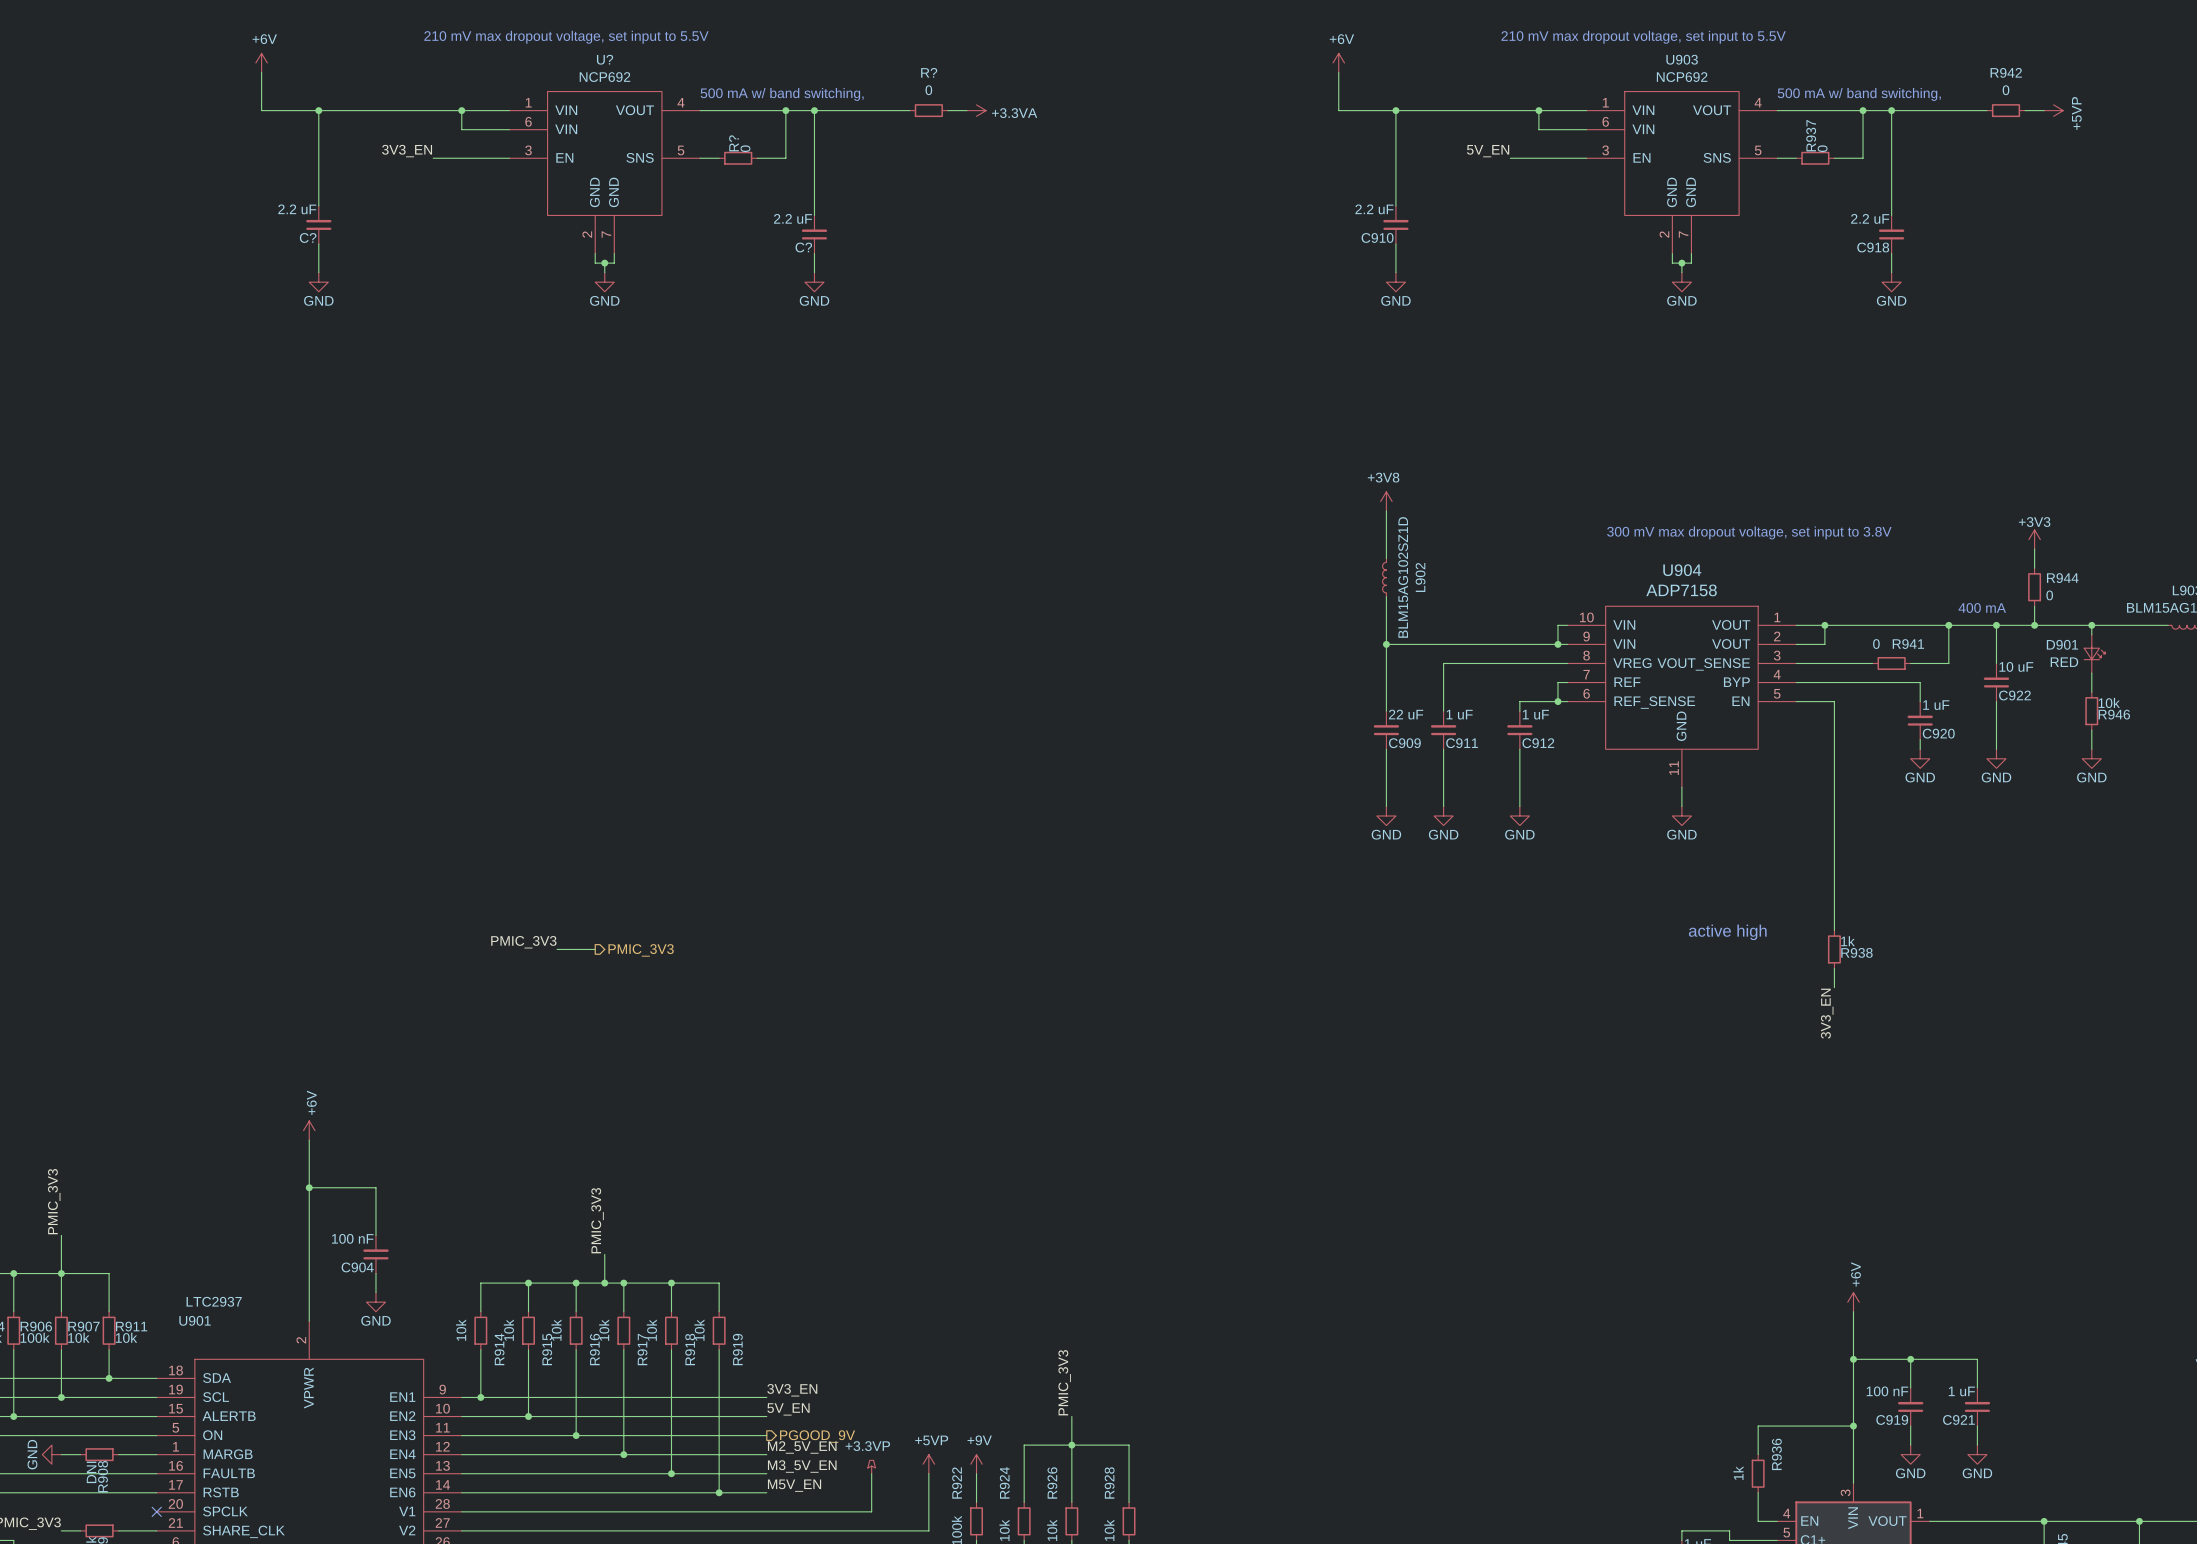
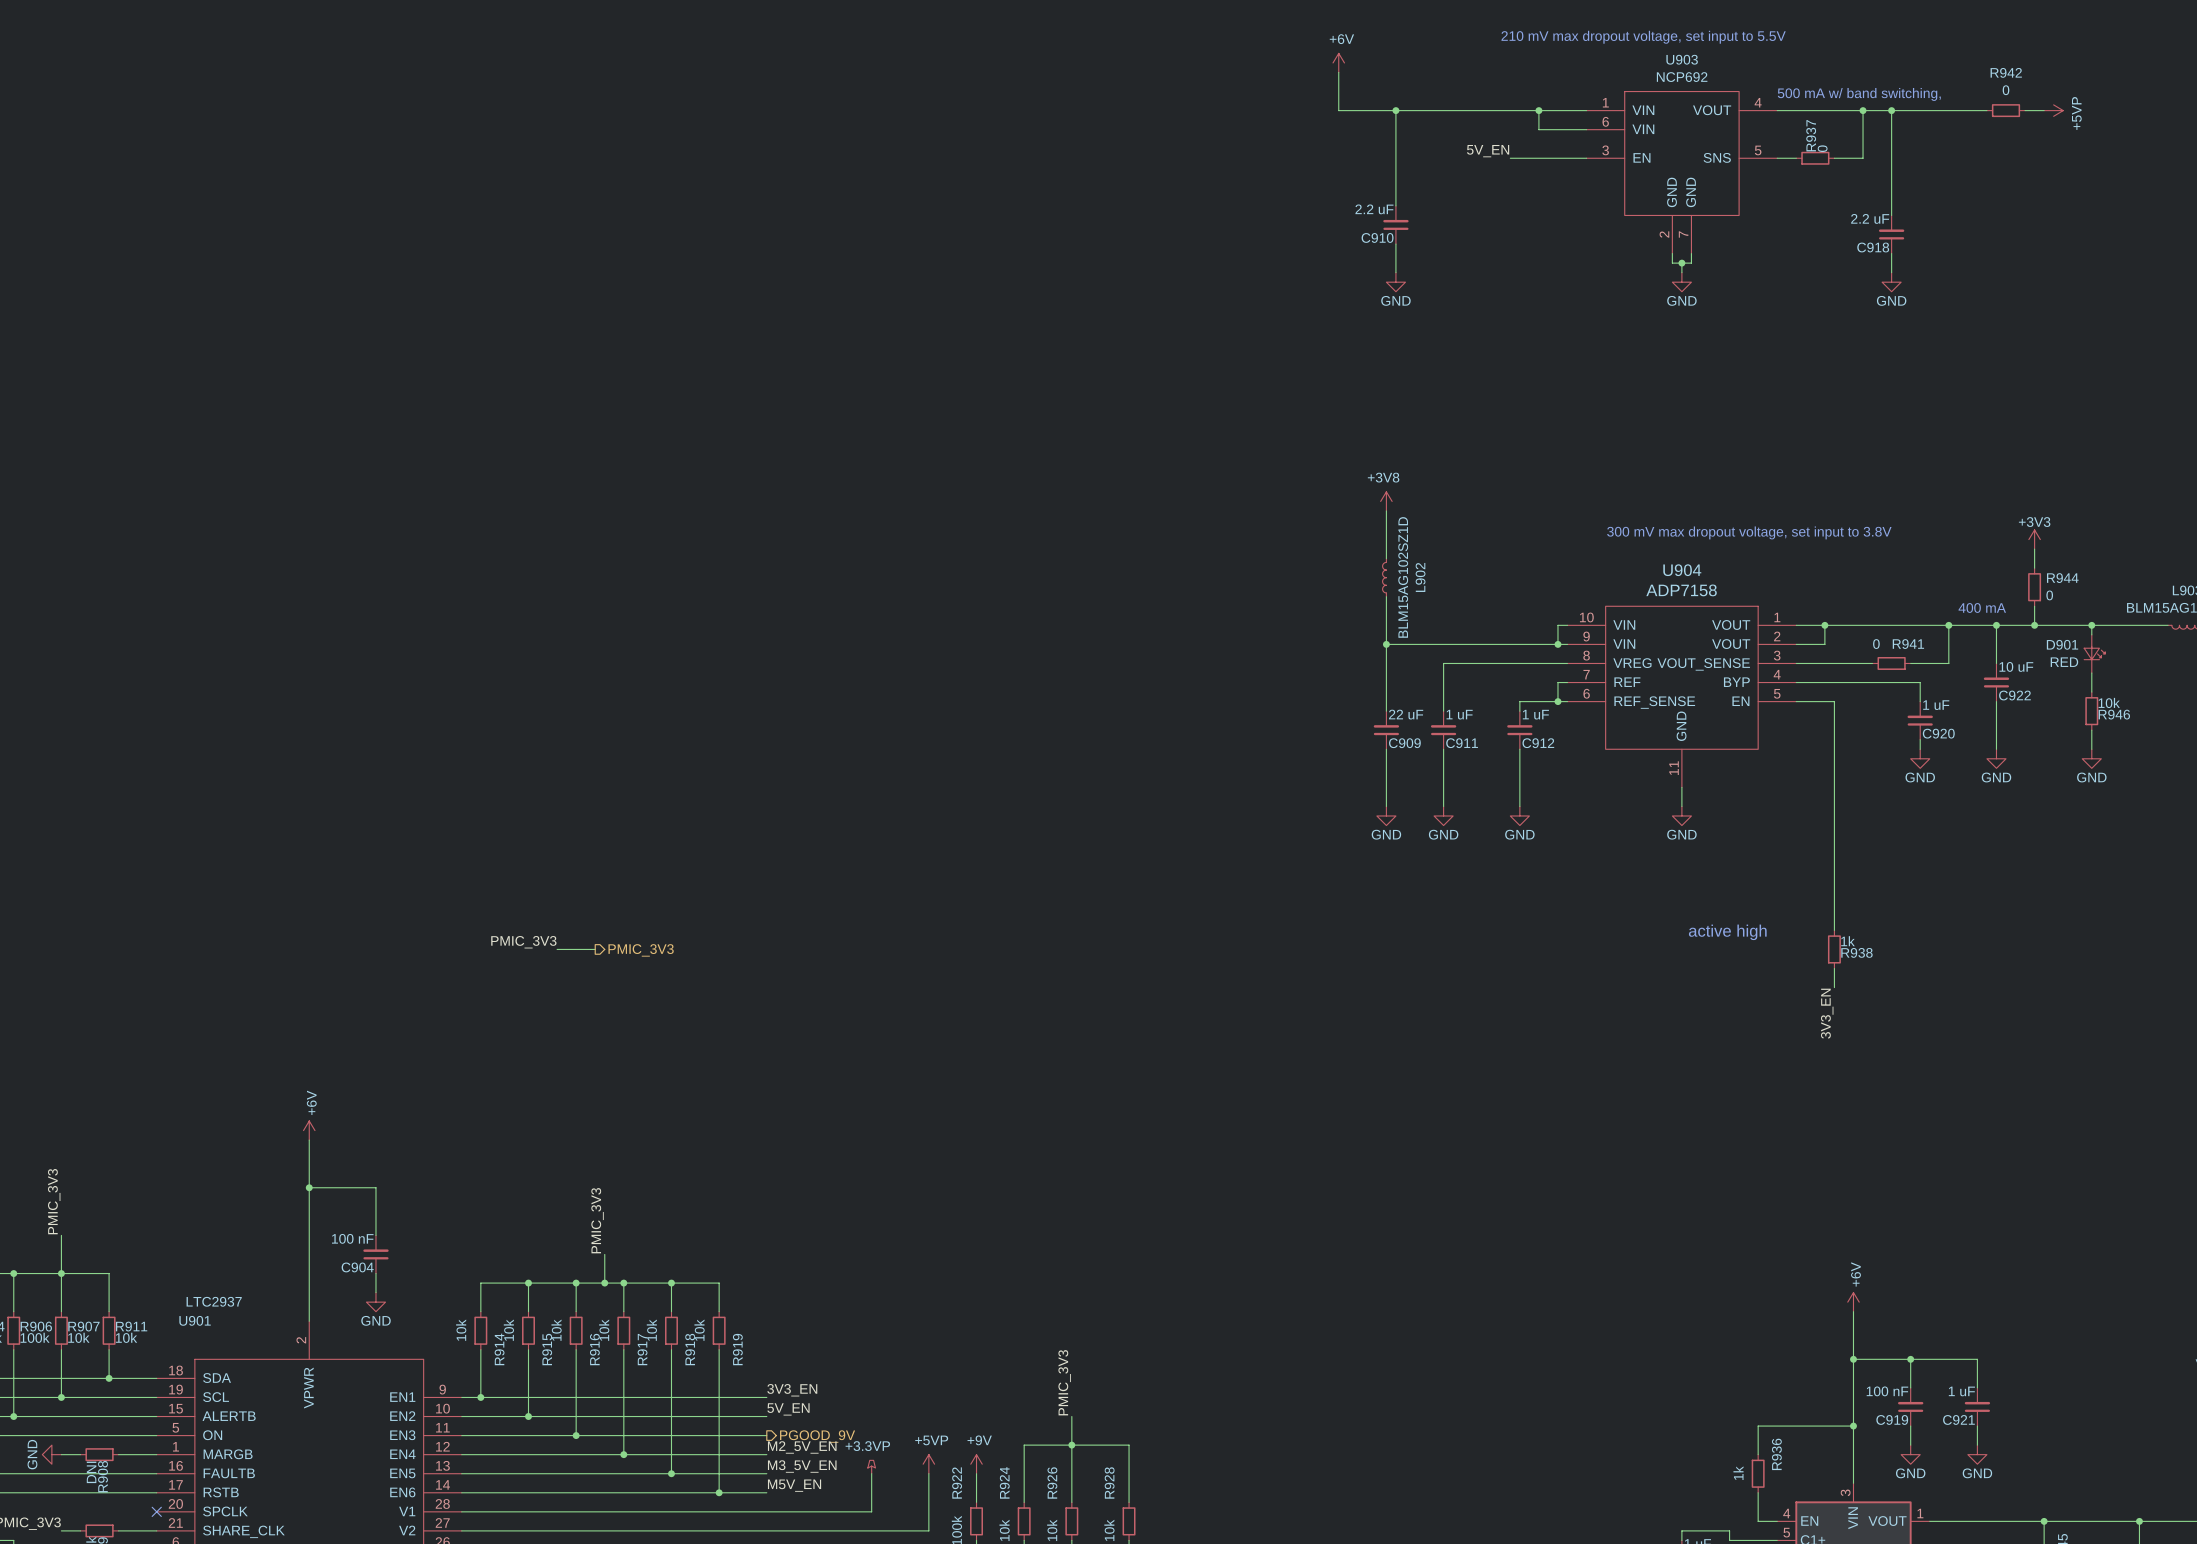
text: 210 mV max dropout voltage, set input to 5.5V (566, 37) -> none
power symbol: +6V (261, 62) -> none
wire: (261, 72) (261, 110) (509, 110) -> none
text: 500 mA w/ band switching, (782, 94) -> none
wire: (318, 110) (318, 205) -> none
junction: (318, 110) -> none
wire: (461, 110) (461, 129) (509, 129) -> none
junction: (461, 110) -> none
wire: (700, 110) (909, 110) -> none
wire: (785, 110) (785, 158) (757, 158) -> none
junction: (785, 110) -> none
wire: (814, 110) (814, 215) -> none
junction: (814, 110) -> none
R?: 0 (928, 110) -> none
wire: (947, 110) (966, 110) -> none
power symbol: +3.3VA (976, 110) -> none
label: 3V3_EN (407, 151) -> none
wire: (433, 158) (509, 158) -> none
wire: (700, 158) (719, 158) -> none
R?: 0 (738, 158) -> none
U?: NCP692 (604, 172) -> none
C?: 2.2 uF (318, 224) -> none
C?: 2.2 uF (814, 234) -> none
wire: (318, 244) (318, 272) -> none
wire: (595, 253) (595, 263) (614, 263) (614, 253) -> none
wire: (814, 253) (814, 272) -> none
wire: (604, 263) (604, 272) -> none
junction: (604, 263) -> none
power symbol: GND (318, 282) -> none
power symbol: GND (604, 282) -> none
power symbol: GND (814, 282) -> none

